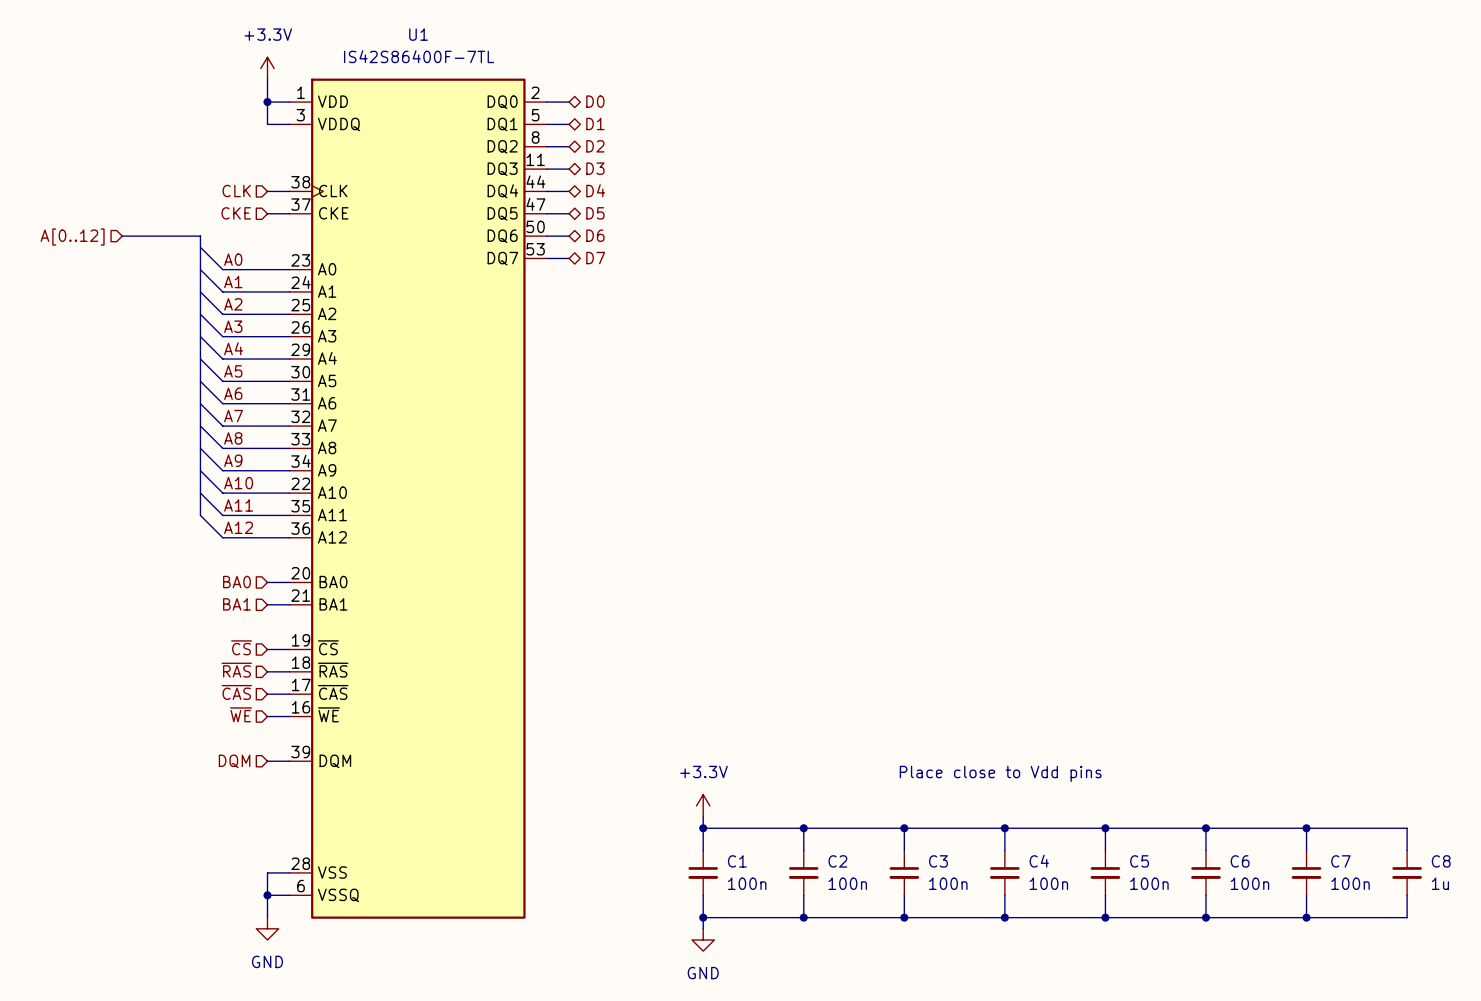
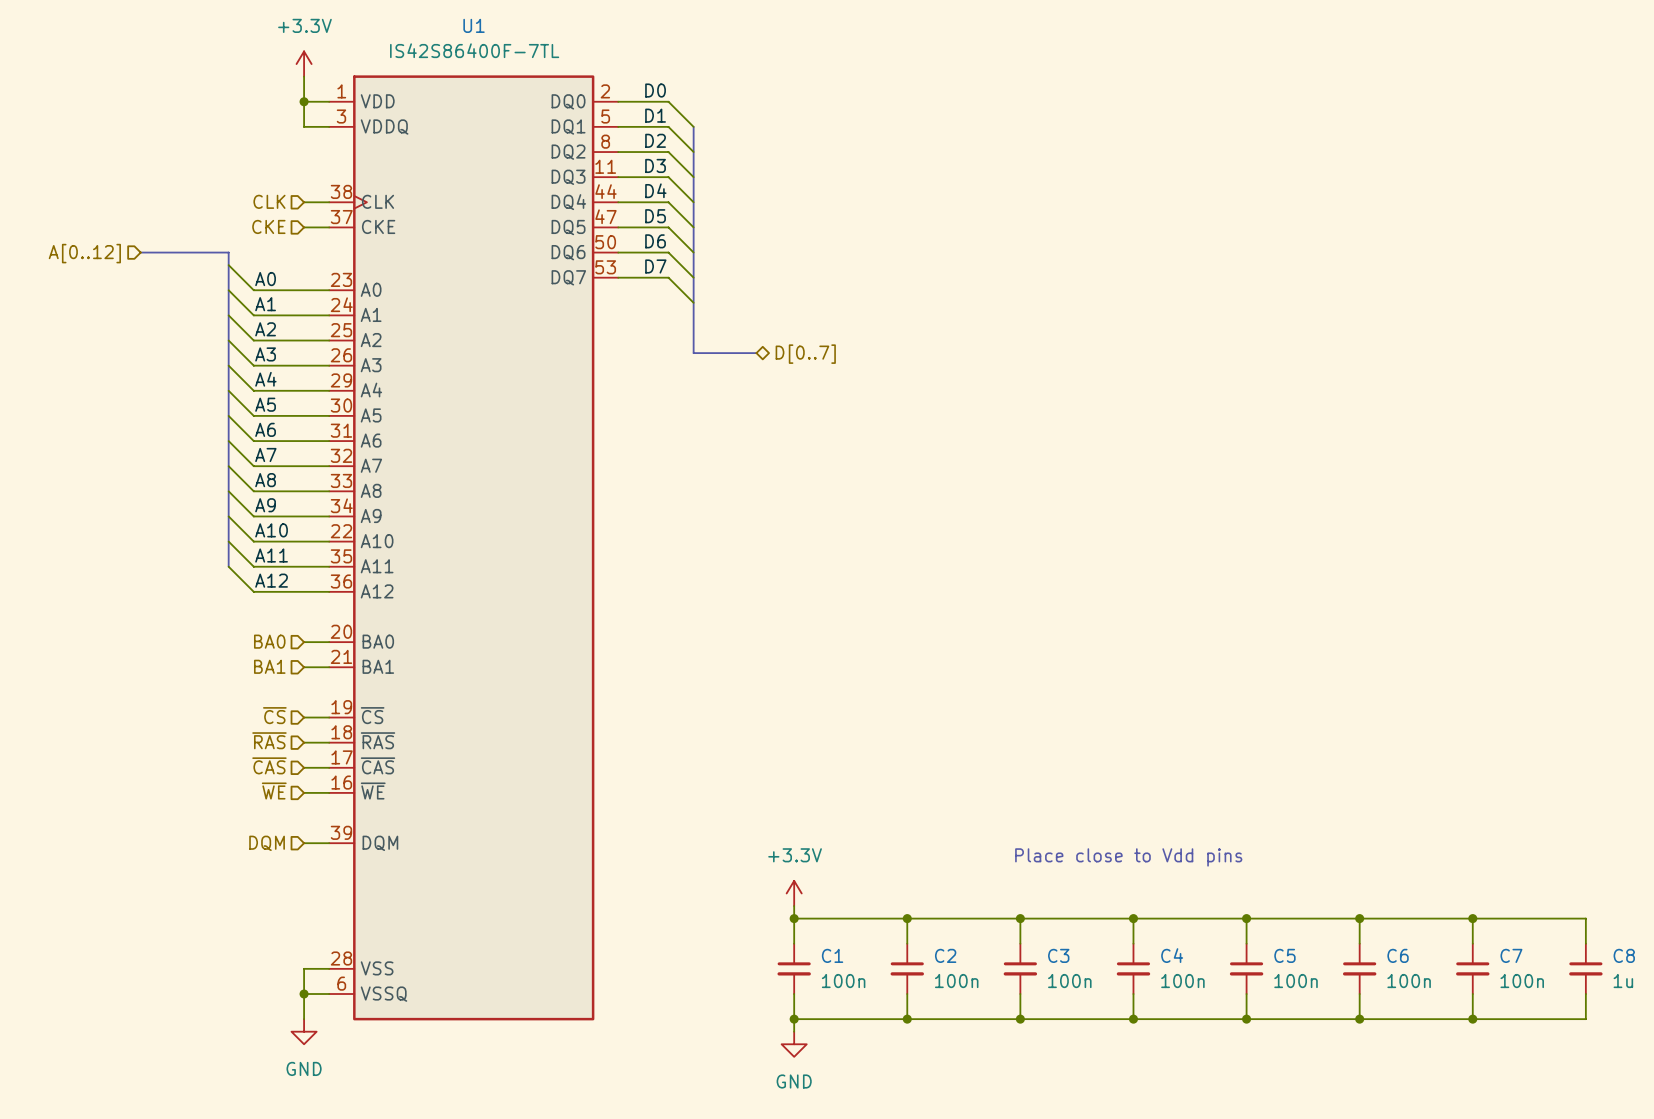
label: none -> D0 (655, 90)
hierarchical label: D0 (595, 101) -> none
wire: none -> (643, 101) (668, 101) (693, 126)
label: none -> D1 (655, 115)
hierarchical label: D1 (595, 123) -> none
wire: none -> (643, 126) (668, 126) (693, 152)
bus: none -> (693, 126) (693, 353) (756, 353)
label: none -> D2 (655, 140)
wire: none -> (643, 152) (668, 152) (693, 177)
hierarchical label: D2 (595, 146) -> none
label: none -> D3 (655, 165)
hierarchical label: D3 (595, 168) -> none
wire: none -> (643, 177) (668, 177) (693, 202)
label: none -> D4 (655, 190)
hierarchical label: D4 (595, 190) -> none
wire: none -> (643, 202) (668, 202) (693, 227)
label: none -> D5 (655, 216)
wire: none -> (643, 227) (668, 227) (693, 252)
hierarchical label: D5 (595, 213) -> none
label: none -> D6 (655, 241)
hierarchical label: D6 (595, 235) -> none
wire: none -> (643, 252) (668, 252) (693, 277)
label: none -> D7 (655, 266)
wire: none -> (643, 277) (668, 277) (693, 302)
hierarchical label: D7 (595, 258) -> none
hierarchical label: none -> D[0..7] (805, 354)

